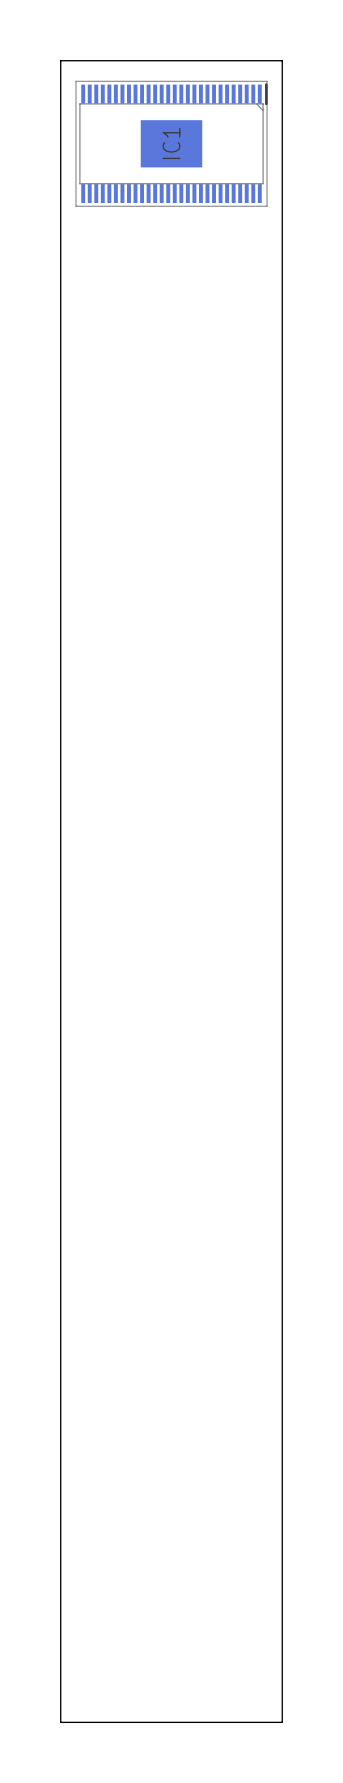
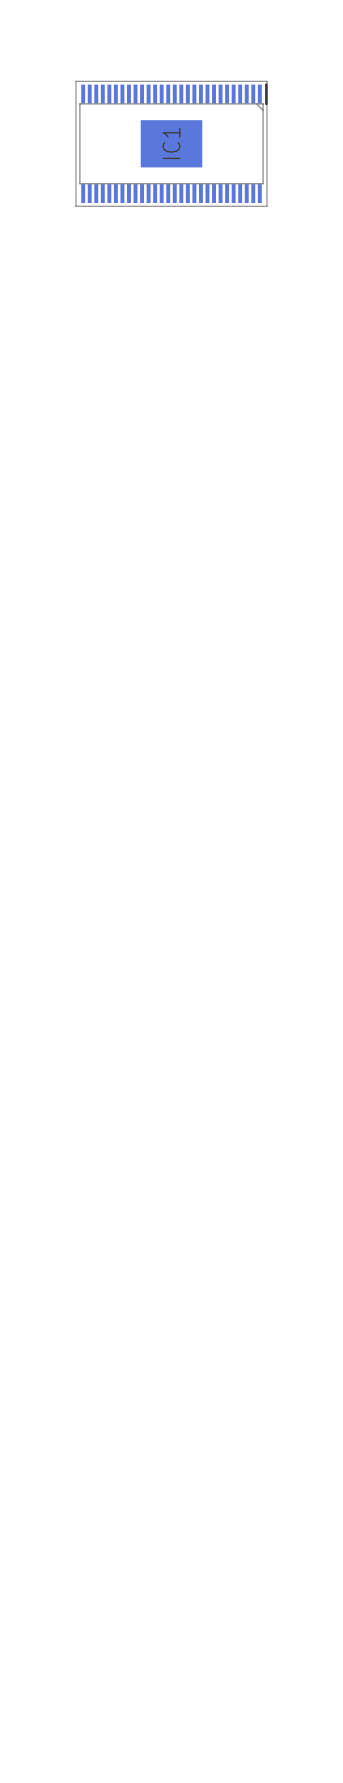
board edge: (282, 60) (60, 60) (60, 1722) (282, 1722) (282, 60) -> none

